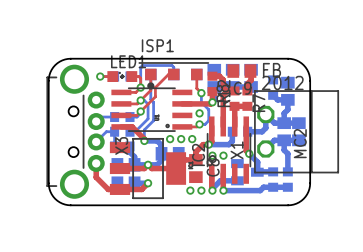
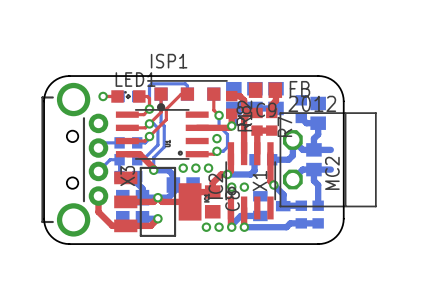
part: (298, 131) -> none

